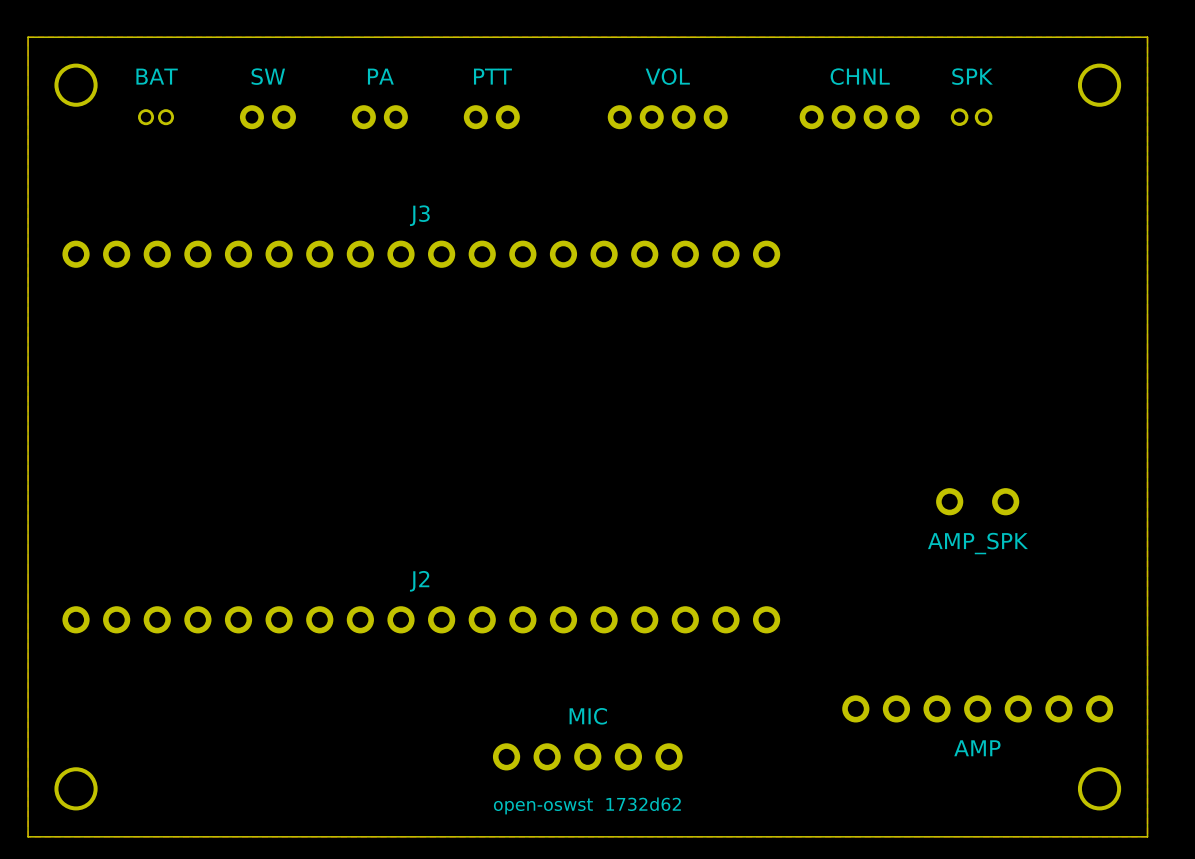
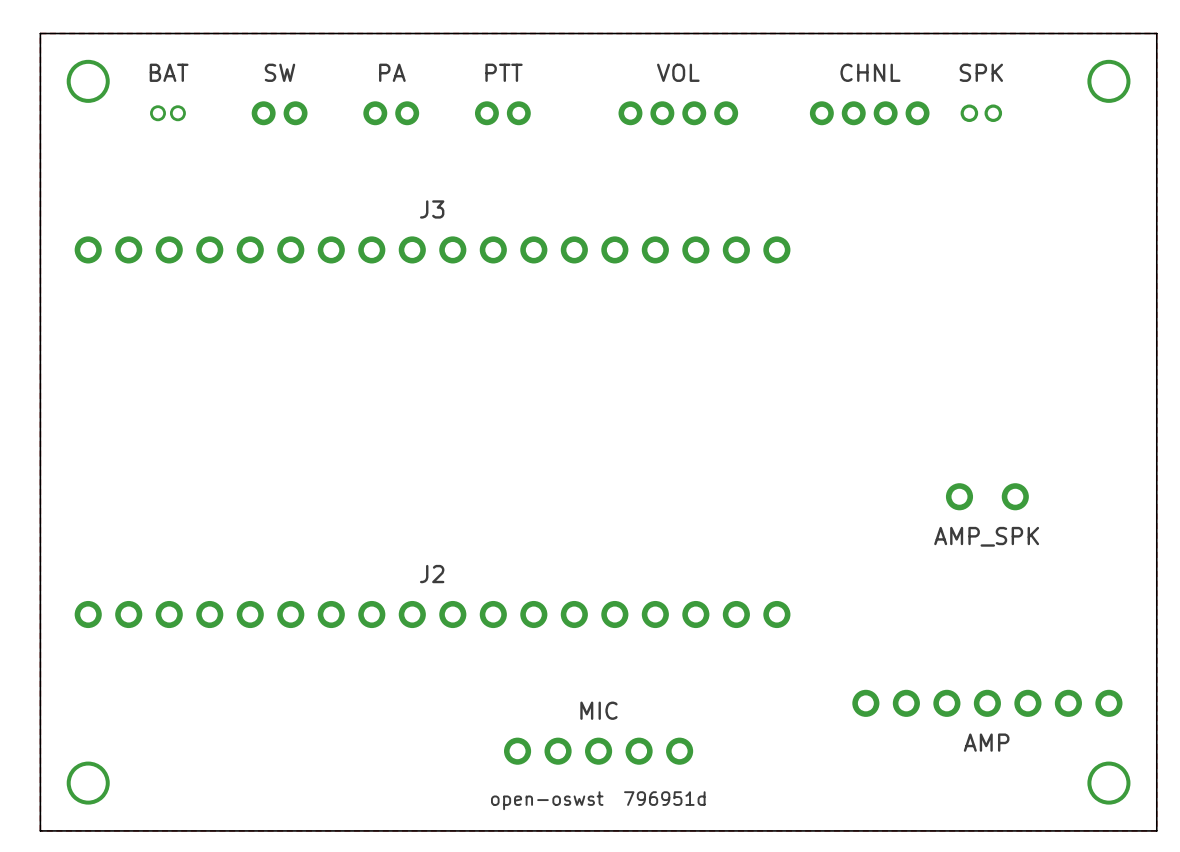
text: open-oswst 1732d62 (587, 805) -> open-oswst 796951d (598, 800)

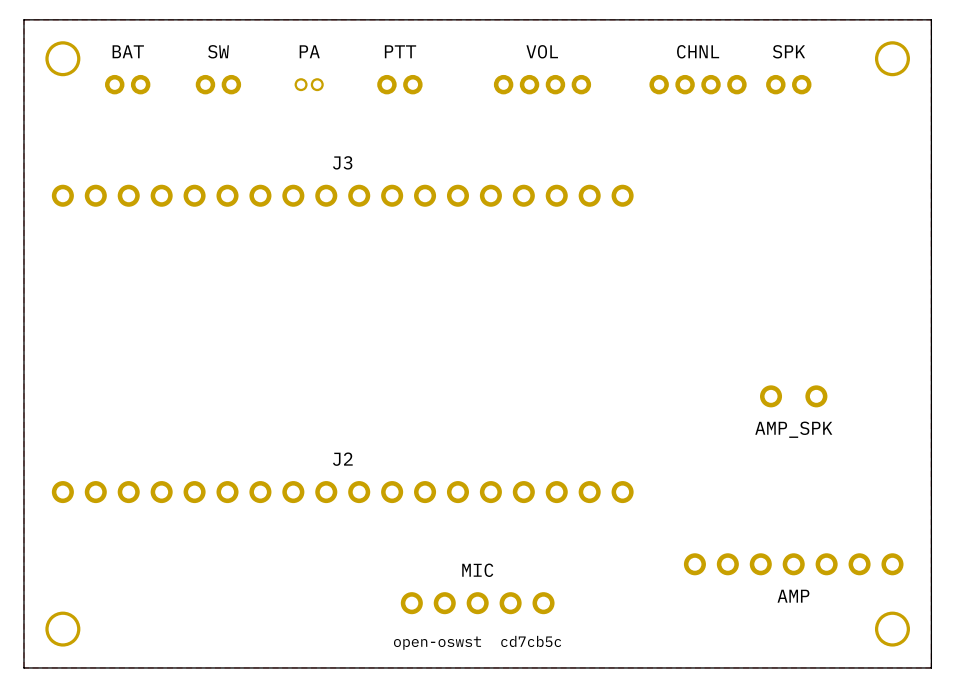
PA footprint: [363, 101, 420, 126] -> [294, 78, 324, 92]
SPK footprint: [960, 104, 1003, 123] -> [766, 74, 812, 95]
BAT footprint: [150, 105, 186, 122] -> [105, 74, 151, 95]
text: open-oswst 796951d (598, 800) -> open-oswst cd7cb5c (477, 642)

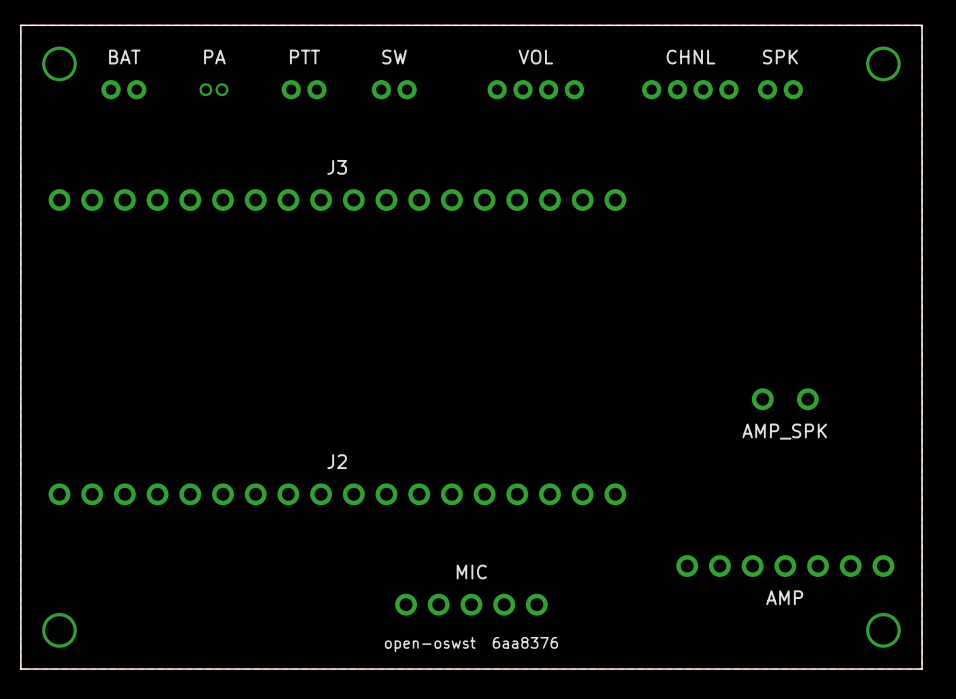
PTT name: PTT (400, 51) -> SW (394, 57)
SW: (218, 84) -> none
PA position: (309, 84) -> (213, 89)
PTT: none -> (304, 89)
text: open-oswst cd7cb5c (477, 642) -> open-oswst 6aa8376 (471, 644)

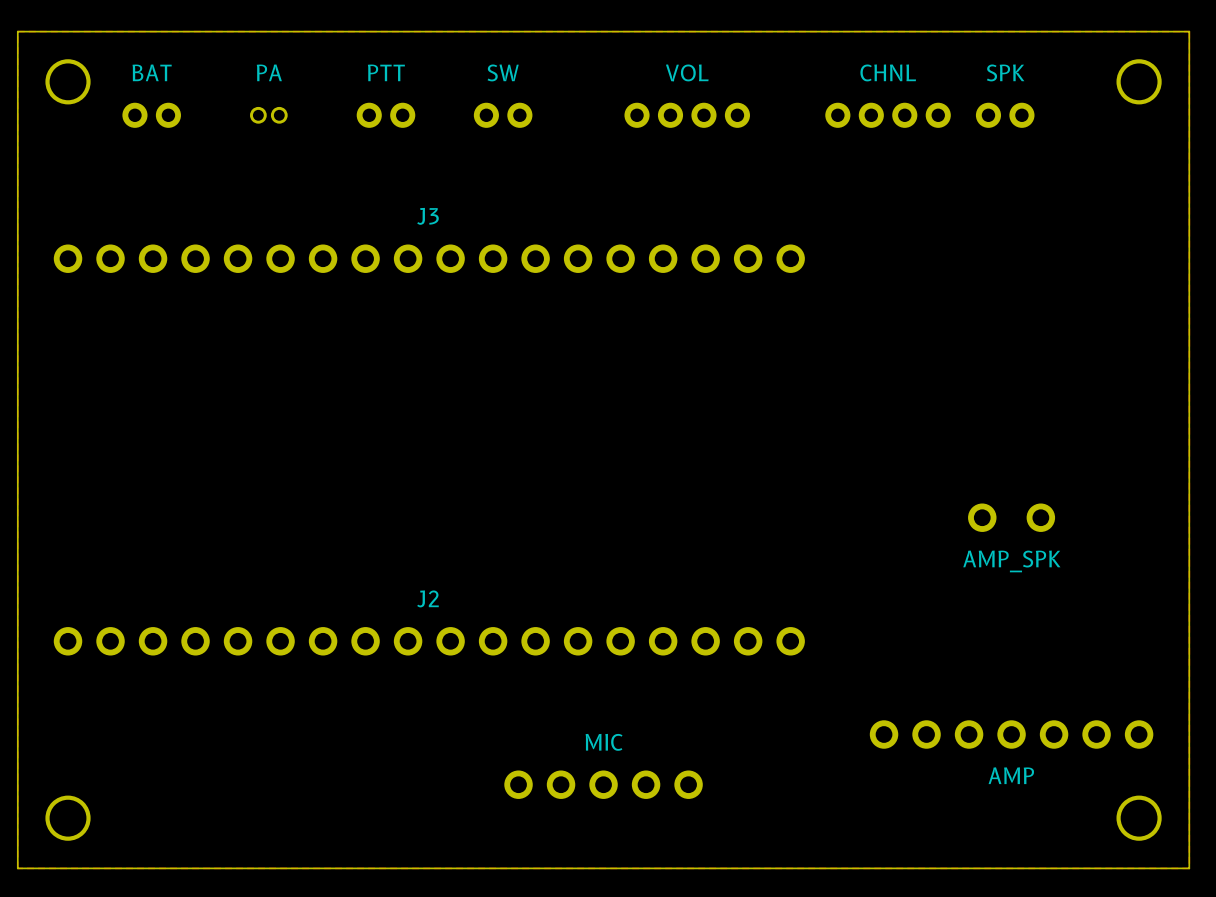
text: open-oswst 6aa8376 (471, 644) -> none

